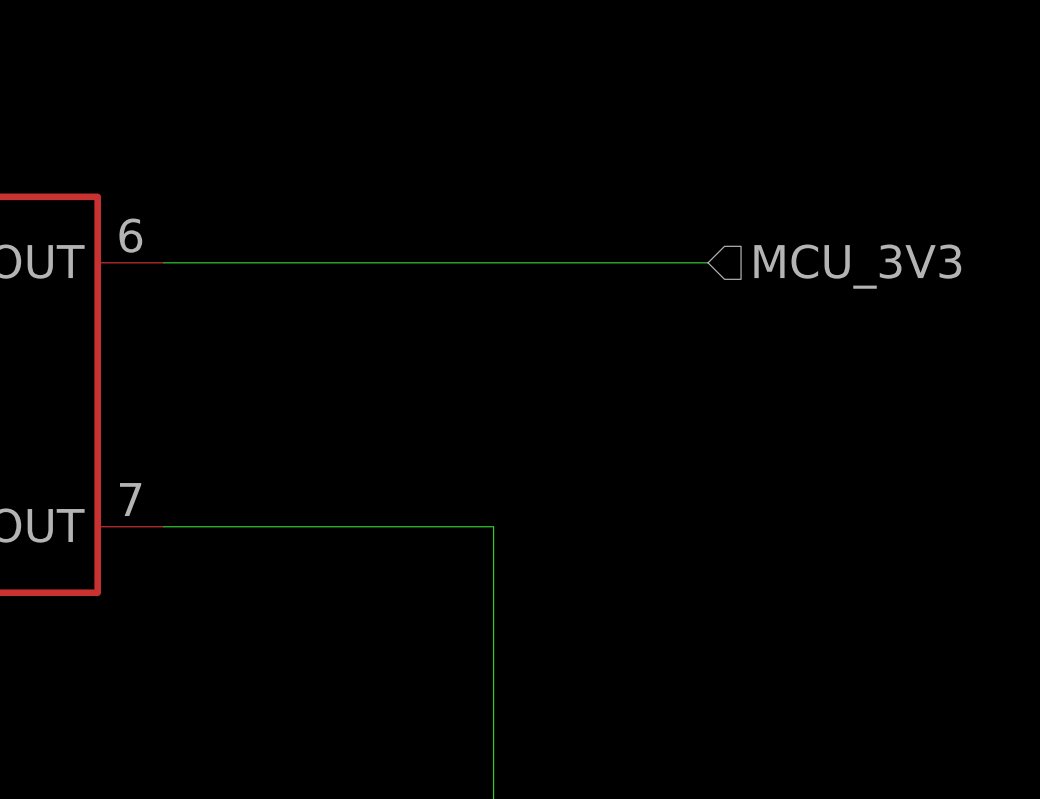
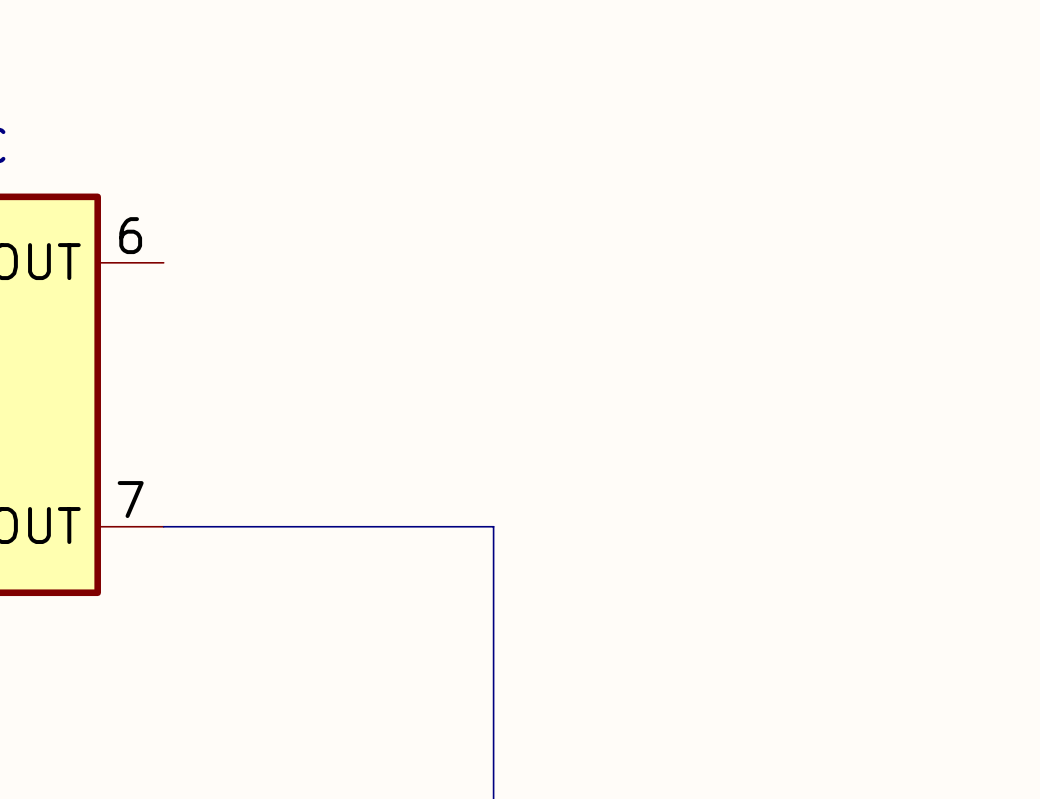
wire: (163, 262) (708, 262) -> none
hierarchical label: MCU_3V3 (857, 266) -> none

